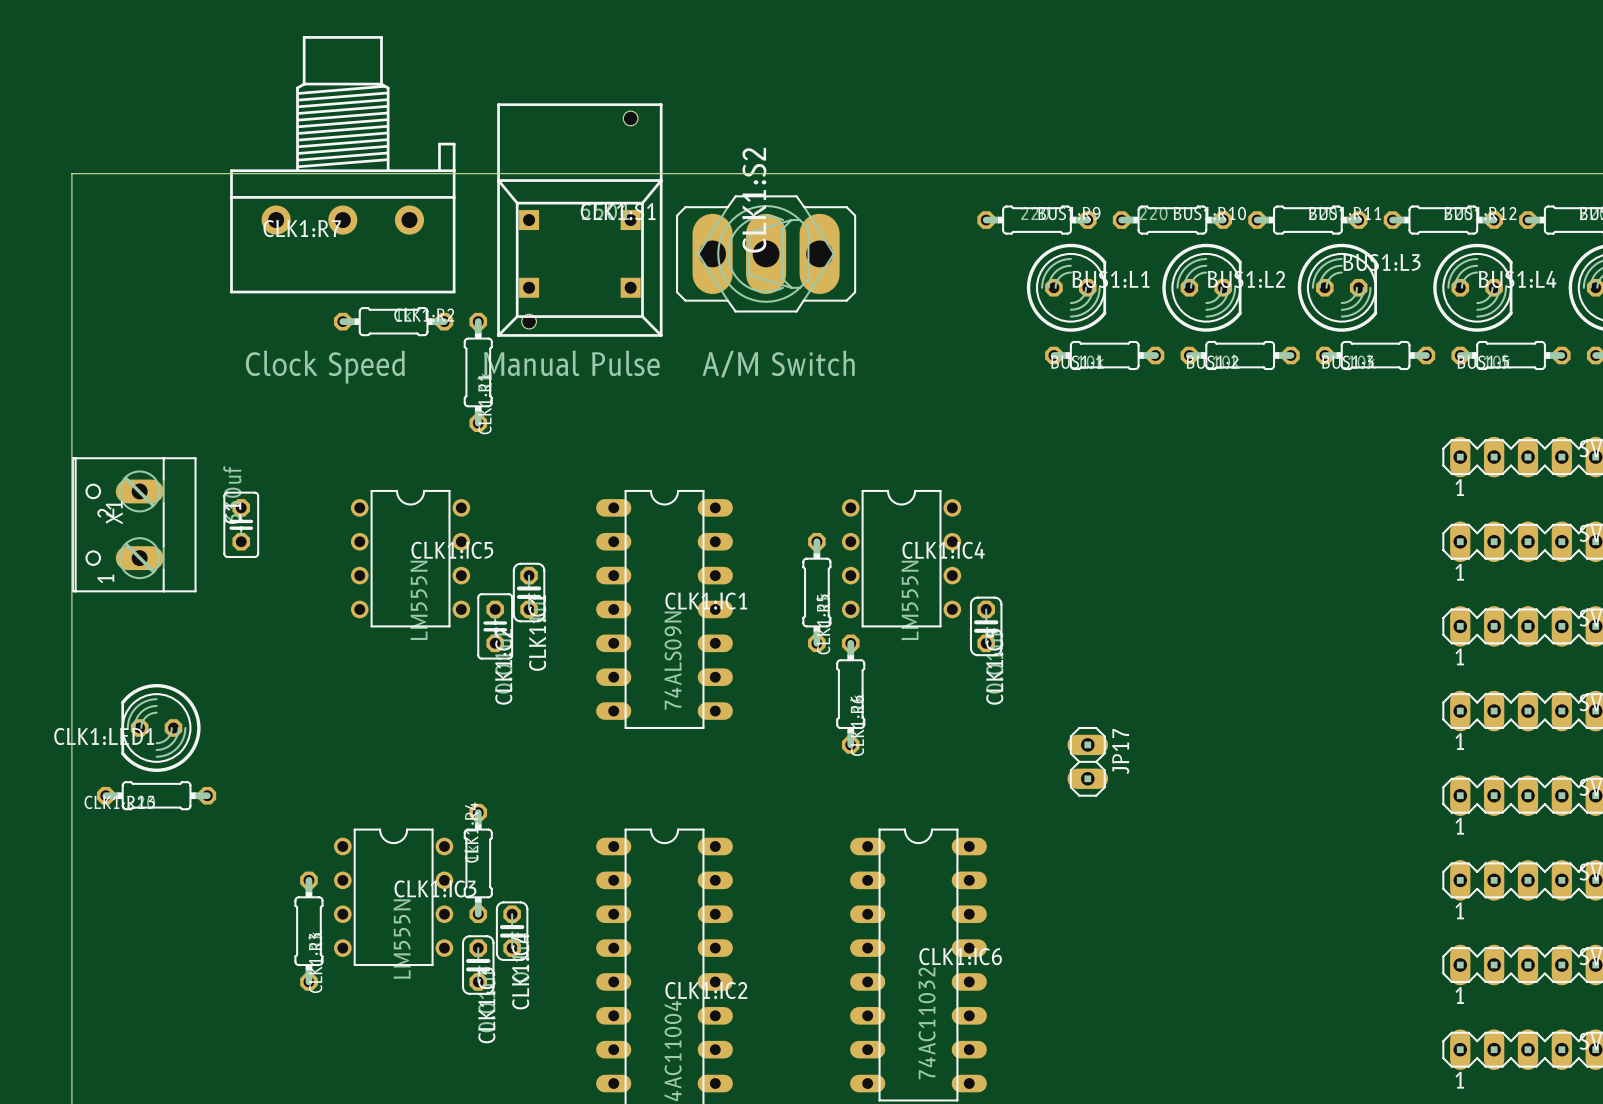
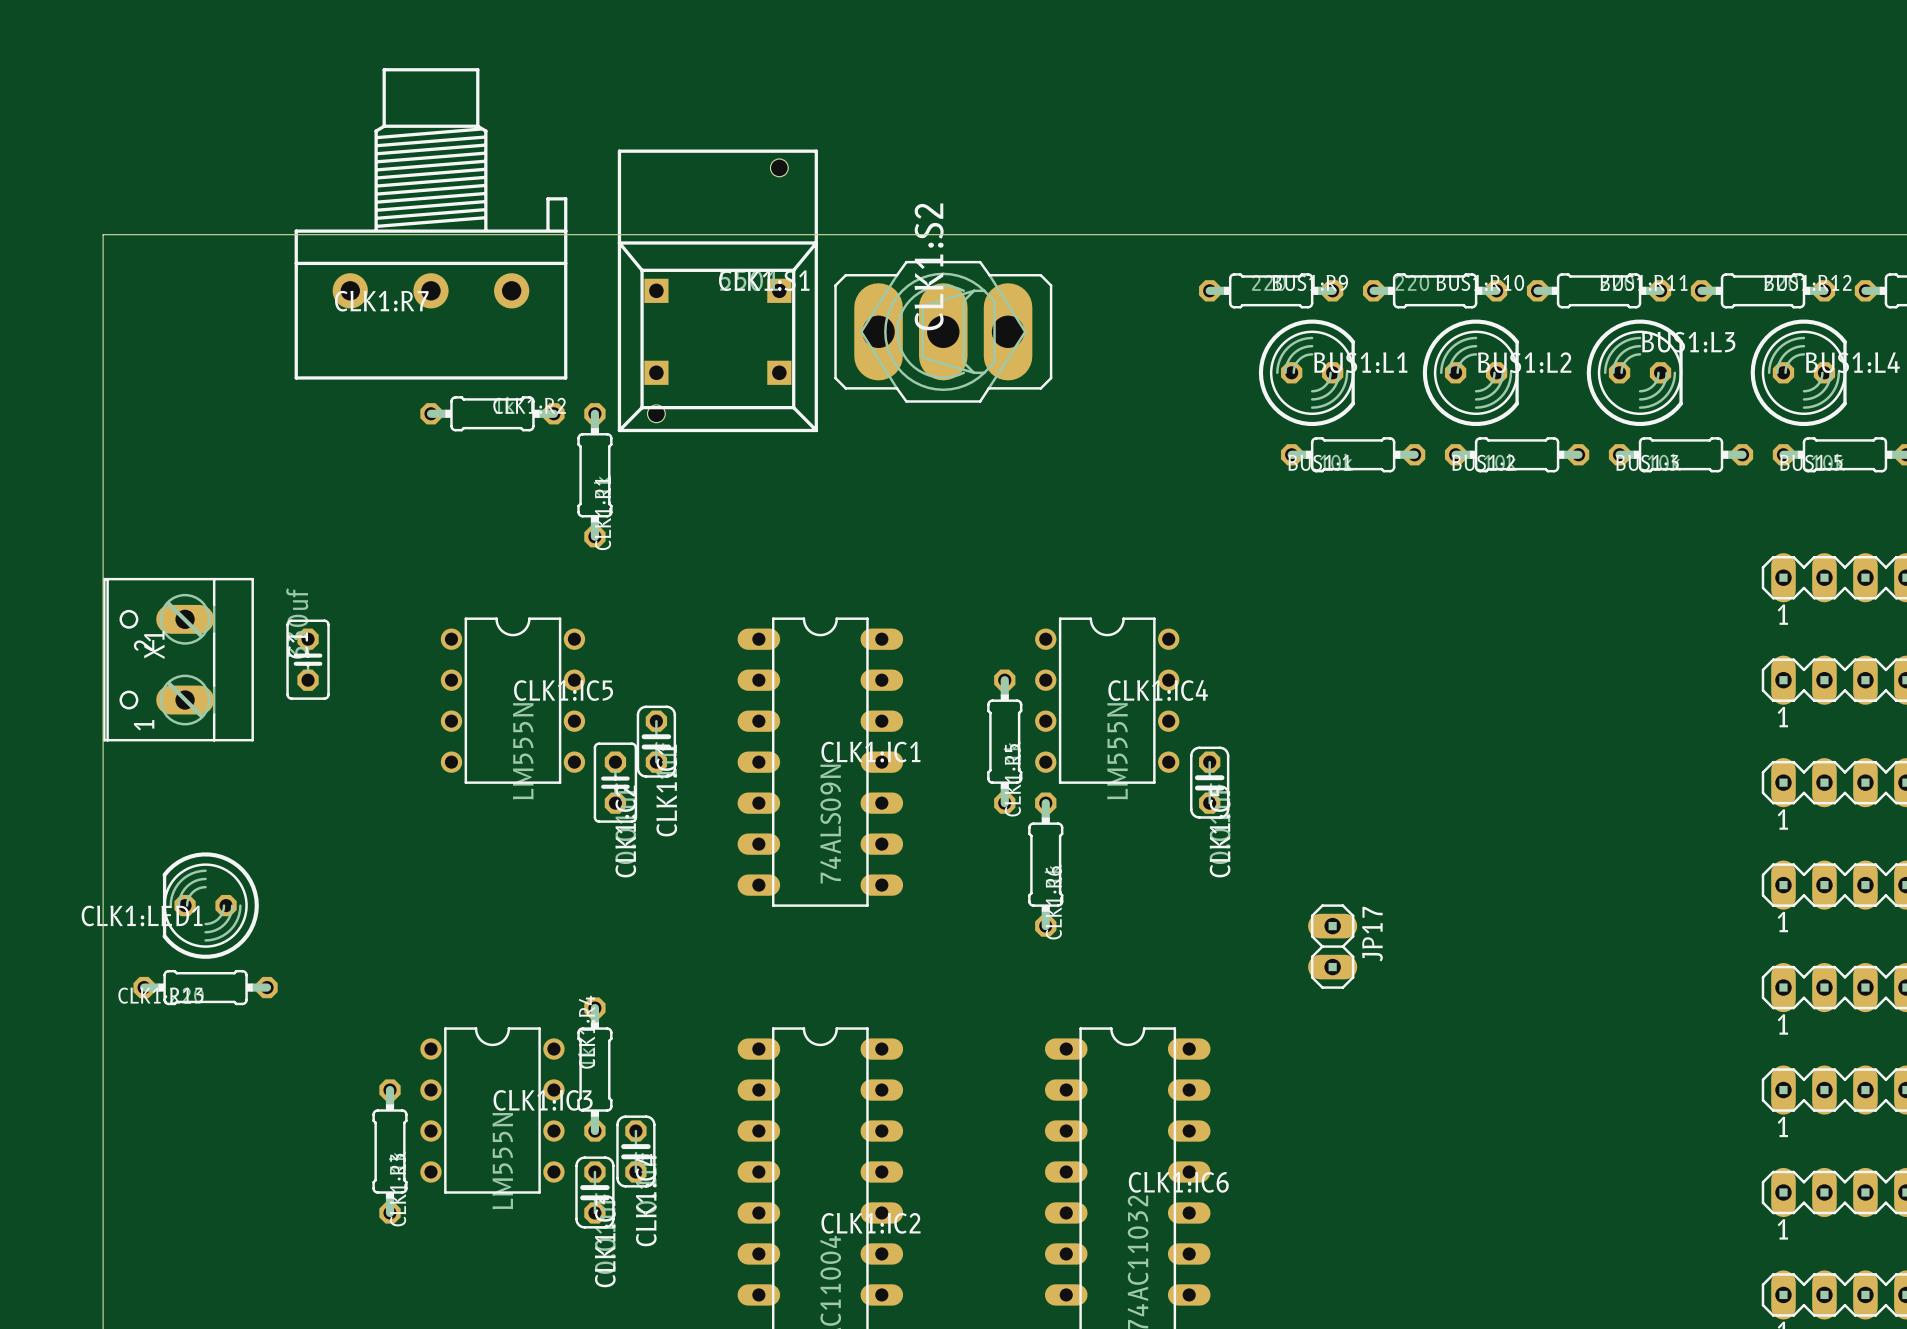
text: Manual Pulse (571, 363) -> none
text: A/M Switch (778, 363) -> none
text: Clock Speed (325, 367) -> none

